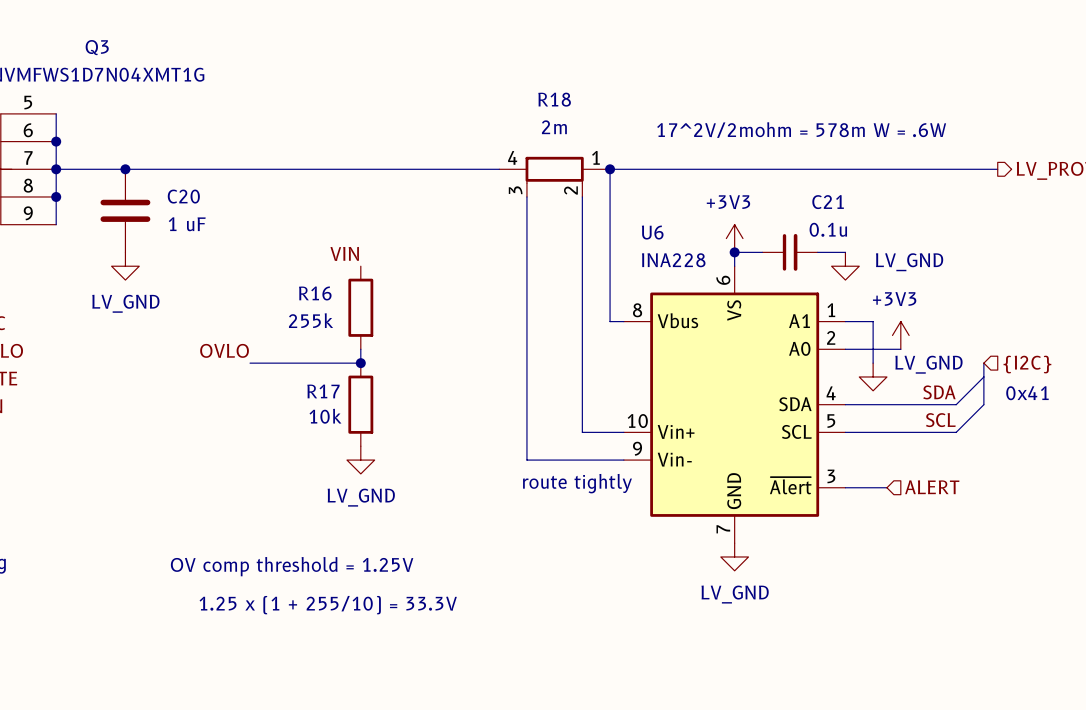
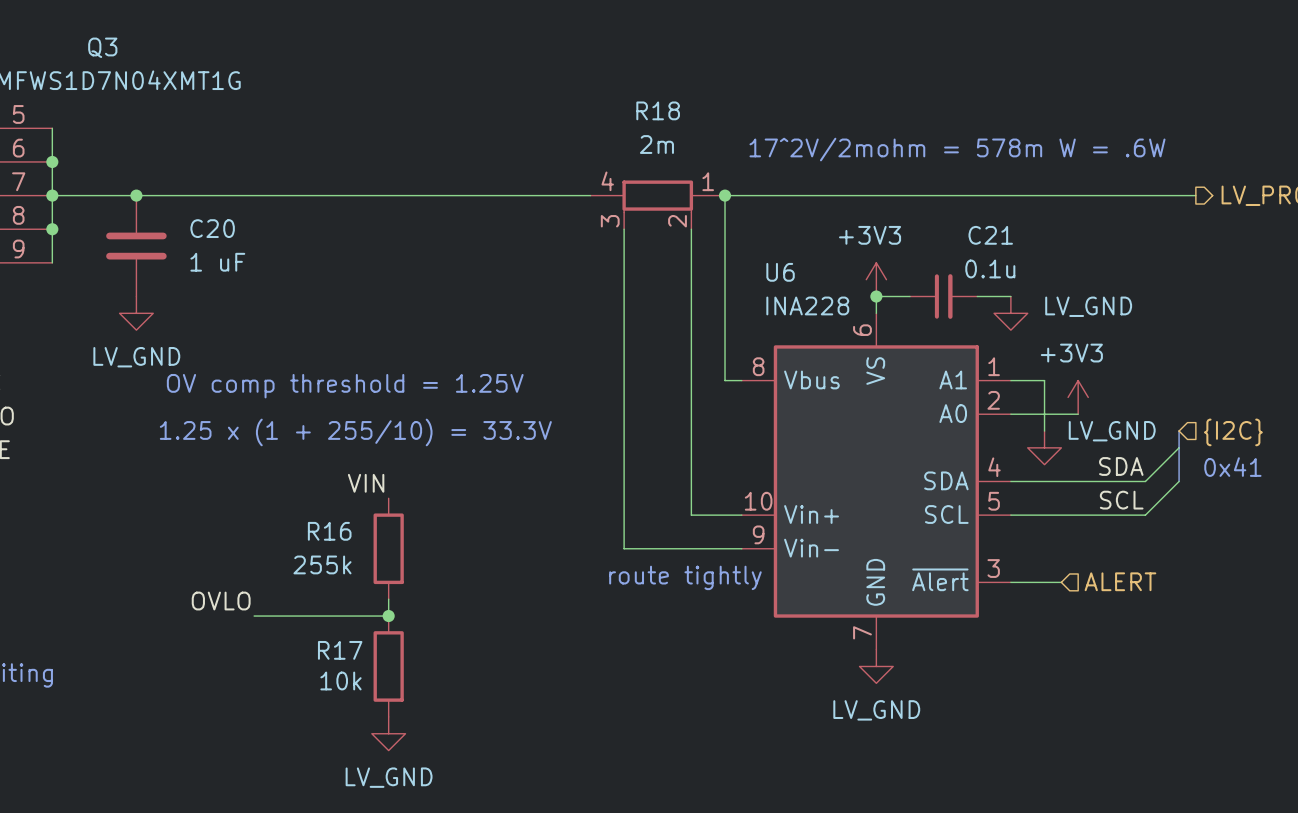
label position: VIN (344, 253) -> VIN (366, 483)
R16 position: (360, 307) -> (388, 548)
wire: (360, 349) (360, 363) (250, 363) -> (388, 599) (388, 616) (254, 616)
label position: OVLO (224, 350) -> OVLO (221, 601)
junction: (360, 363) -> none
R17 position: (360, 404) -> (388, 666)
power symbol position: LV_GND (360, 460) -> LV_GND (388, 733)
junction: none -> (388, 616)
text position: OV comp threshold = 1.25V (292, 566) -> OV comp threshold = 1.25V (345, 386)
text position: 1.25 x (1 + 255/10) = 33.3V (328, 605) -> 1.25 x (1 + 255/10) = 33.3V (355, 432)

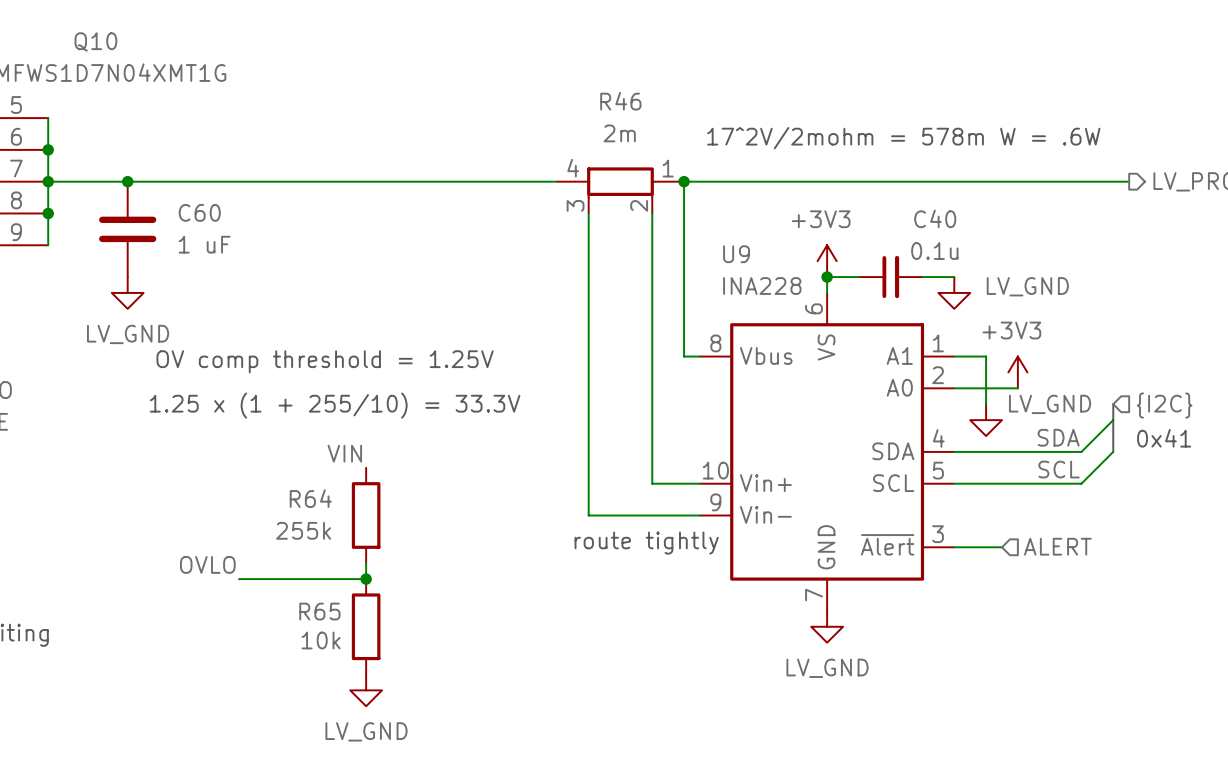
Q3 name: Q3 (102, 47) -> Q10 (95, 41)
R18 name: R18 (658, 110) -> R46 (620, 101)
C20 name: C20 (212, 228) -> C60 (199, 212)
C21 name: C21 (990, 235) -> C40 (935, 218)
U6 name: U6 (780, 272) -> U9 (736, 254)
R16 name: R16 (329, 531) -> R64 (310, 498)
R17 name: R17 (340, 650) -> R65 (319, 611)

